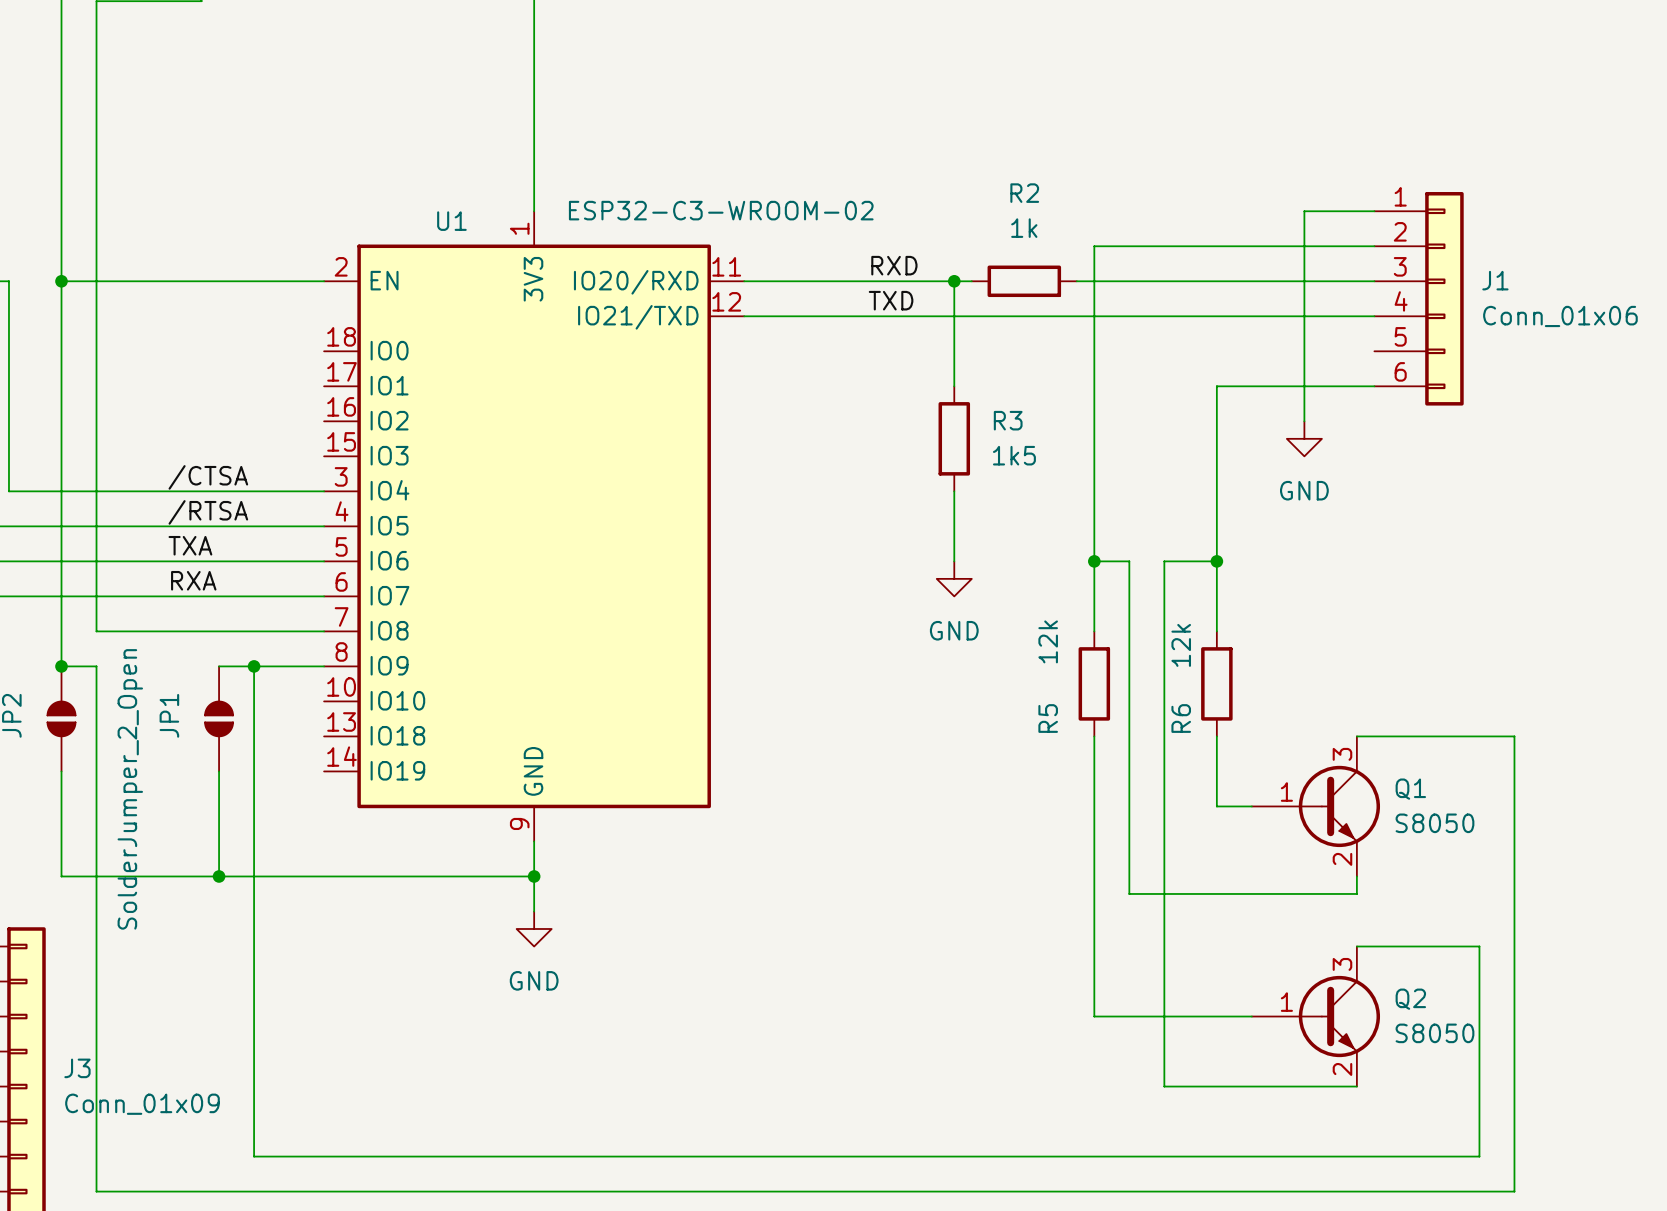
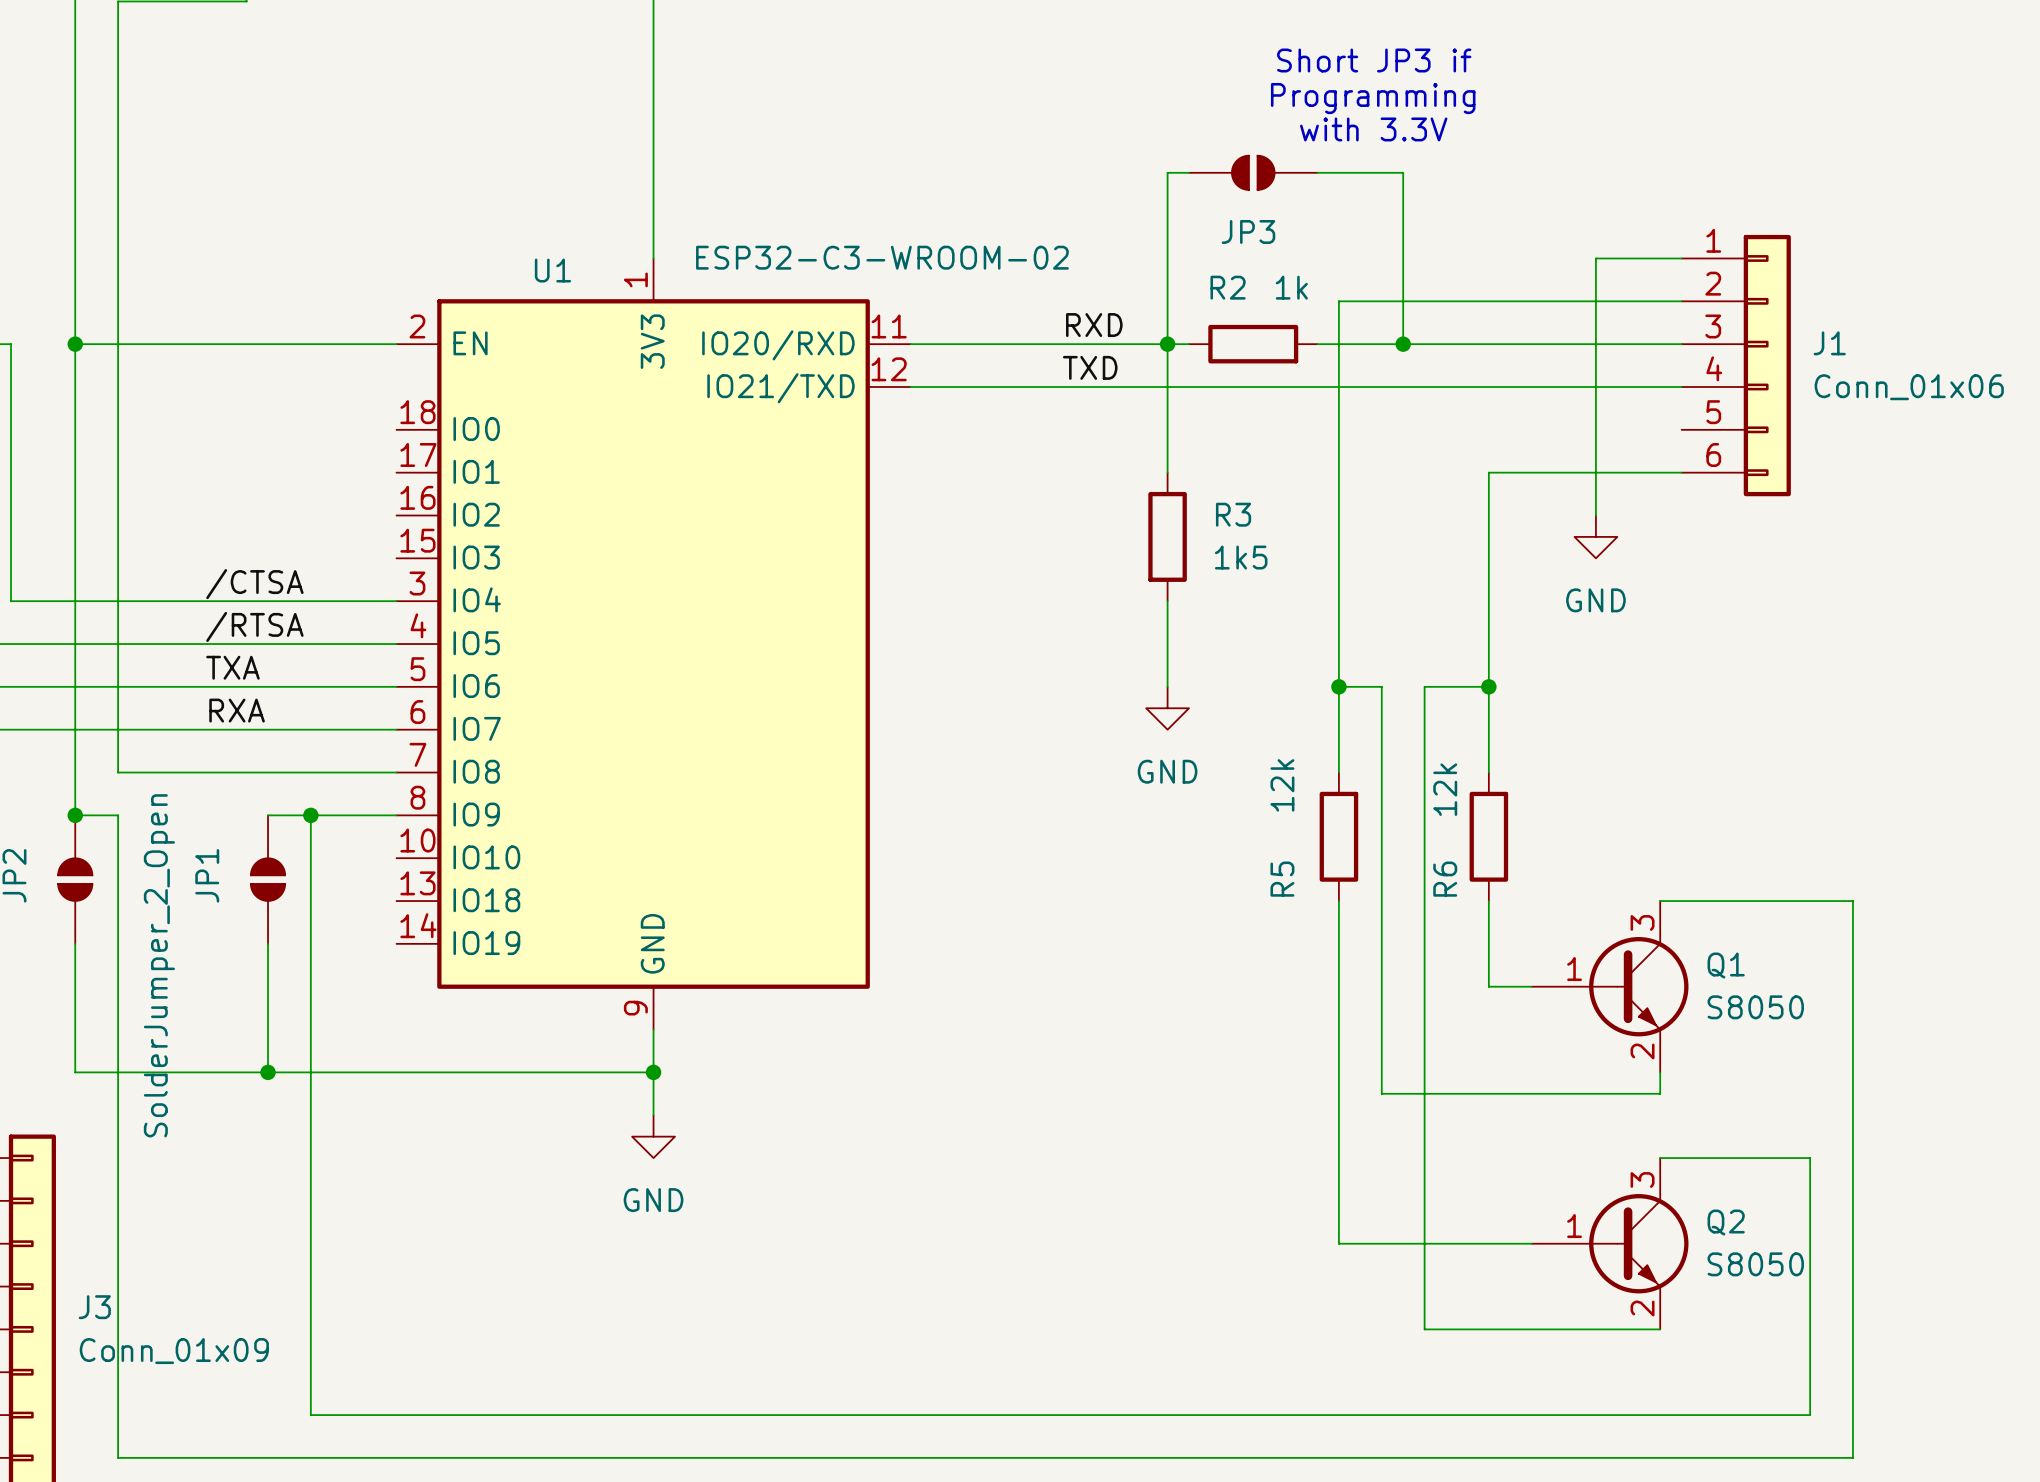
text: none -> Short JP3 if (1374, 60)
text: none -> Programming (1373, 98)
text: none -> with 3.3V (1373, 129)
wire: none -> (1189, 172) (1167, 172) (1167, 344)
JP3: none -> (1253, 172)
wire: none -> (1317, 172) (1403, 172) (1403, 344)
R2 name position: R2 (1024, 193) -> R2 (1228, 287)
R2 value position: 1k (1024, 228) -> 1k (1291, 287)
junction: none -> (1403, 344)

